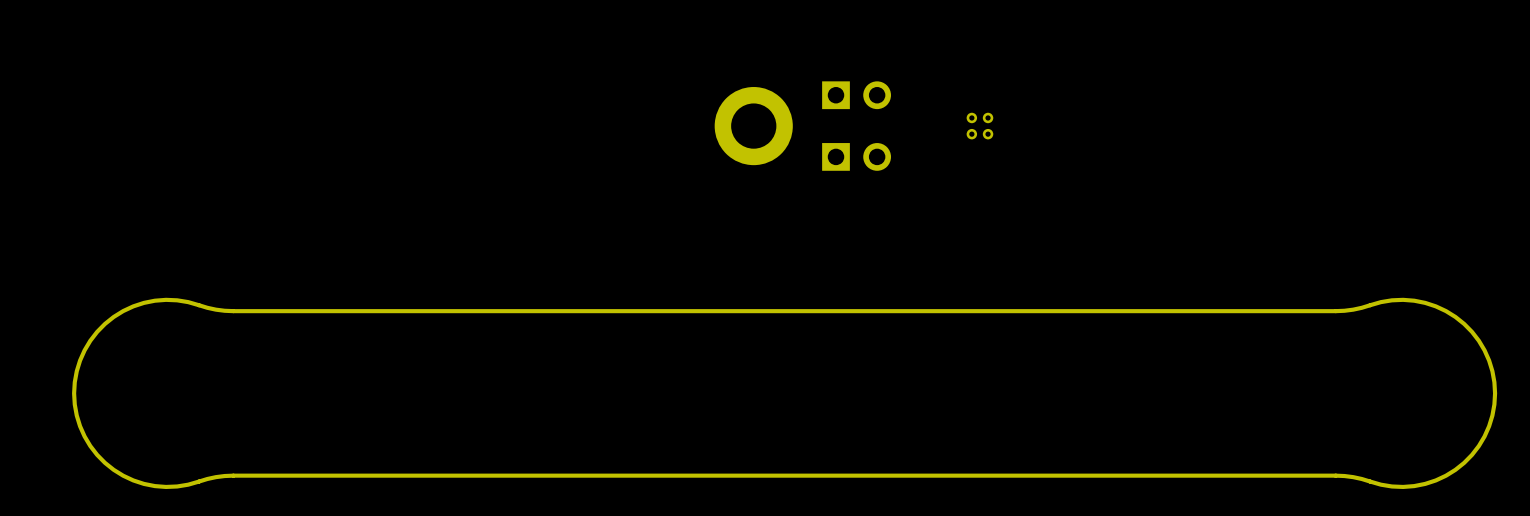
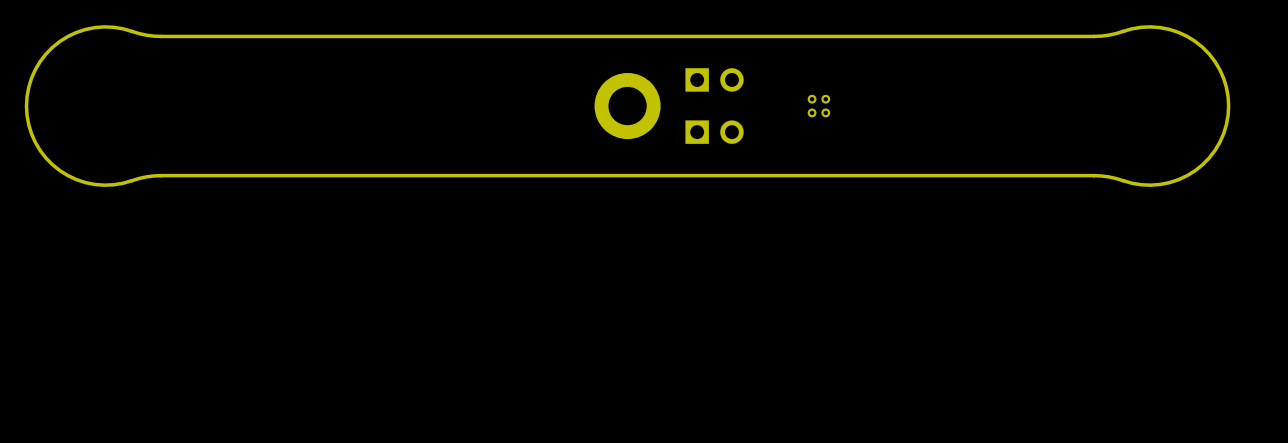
board edge: (1370, 305) (1403, 299) (1435, 306) (1455, 316) (1472, 331) (1489, 360) (1494, 382) (1494, 404) (1484, 436) (1464, 462) (1435, 480) (1403, 486) (1335, 475) (233, 475) (166, 486) (133, 480) (104, 462) (84, 436) (74, 404) (74, 382) (80, 360) (97, 331) (113, 316) (133, 306) (166, 299) (233, 311) (1335, 311) (1370, 305) -> (1123, 31) (1141, 27) (1160, 27) (1187, 36) (1209, 54) (1223, 78) (1228, 106) (1223, 133) (1209, 158) (1195, 170) (1178, 179) (1150, 185) (1093, 175) (161, 175) (104, 185) (76, 179) (52, 164) (35, 142) (27, 115) (27, 96) (31, 78) (45, 54) (68, 36) (85, 29) (104, 26) (161, 36) (1093, 36) (1123, 31)

